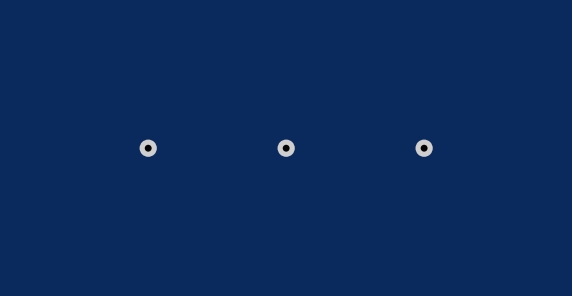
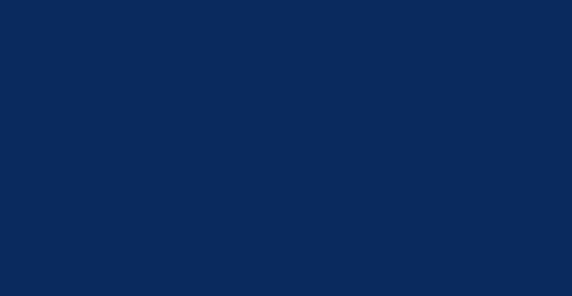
part: (148, 148) -> none
part: (286, 148) -> none
part: (424, 148) -> none

